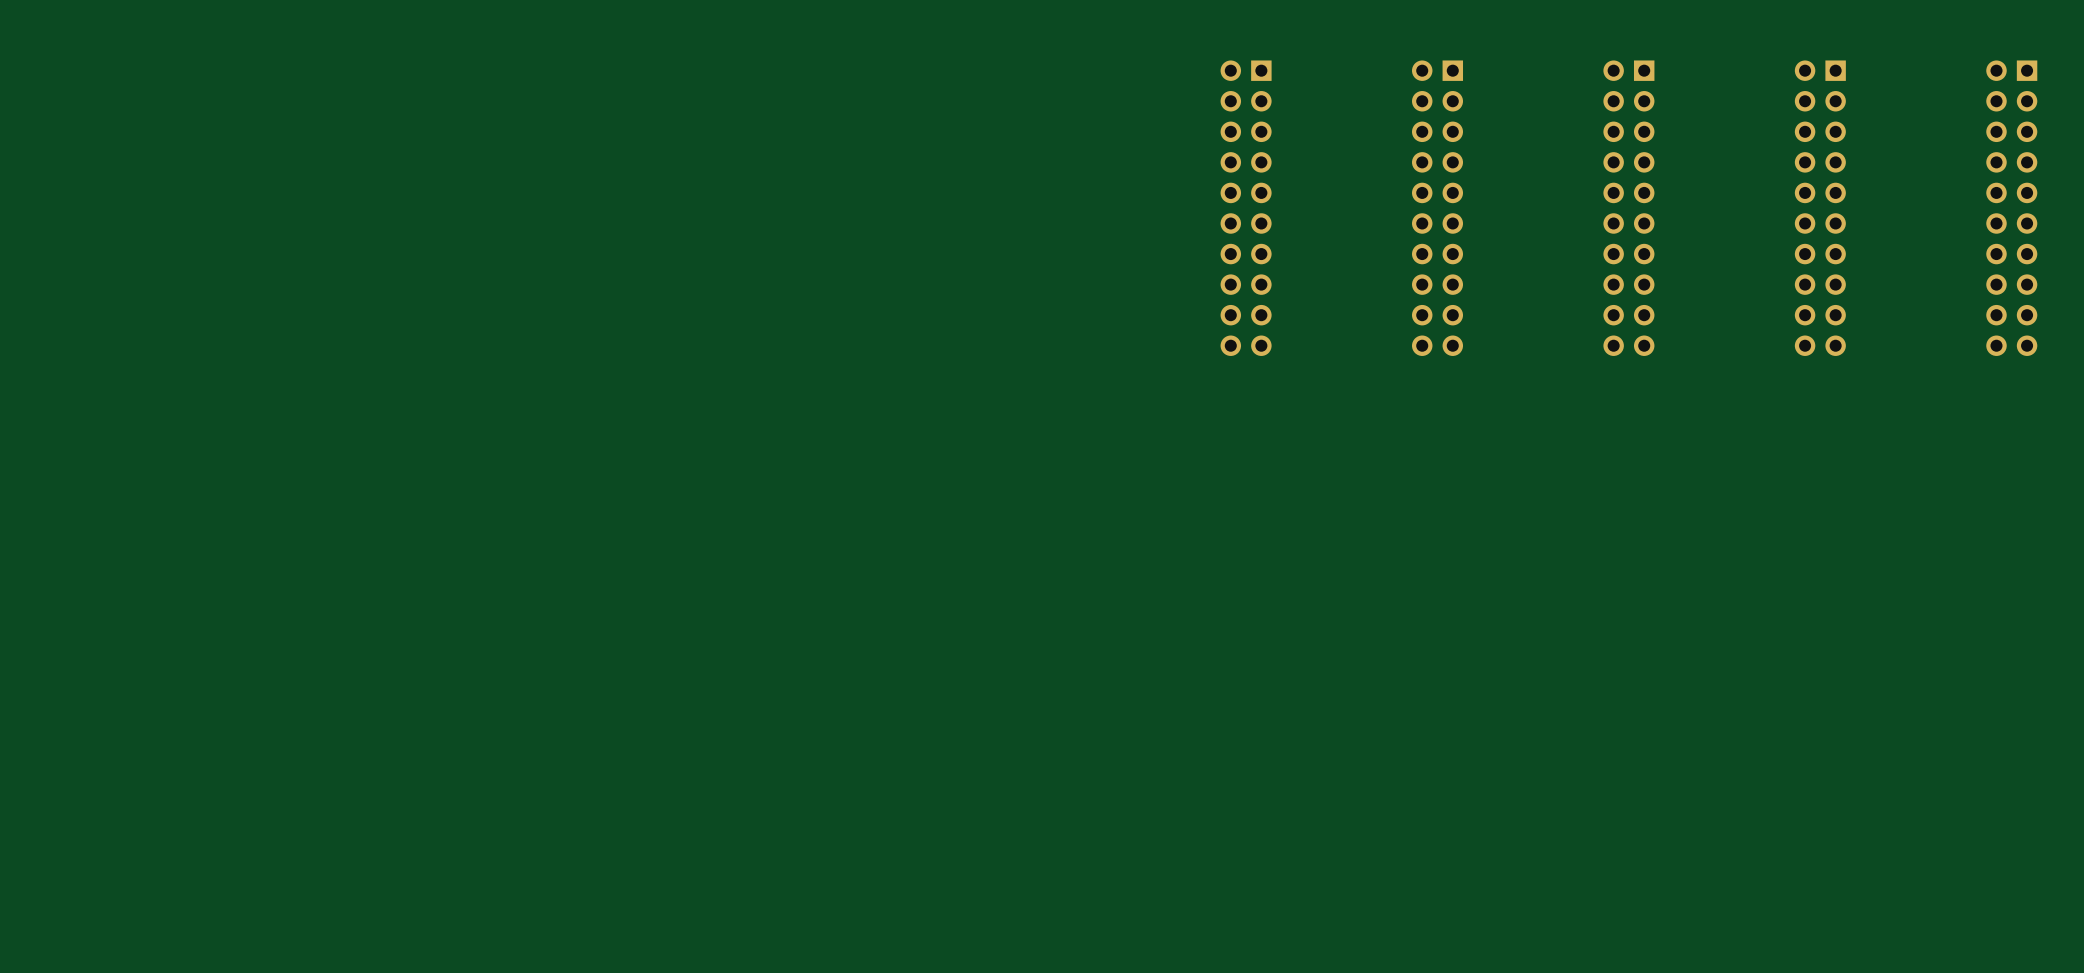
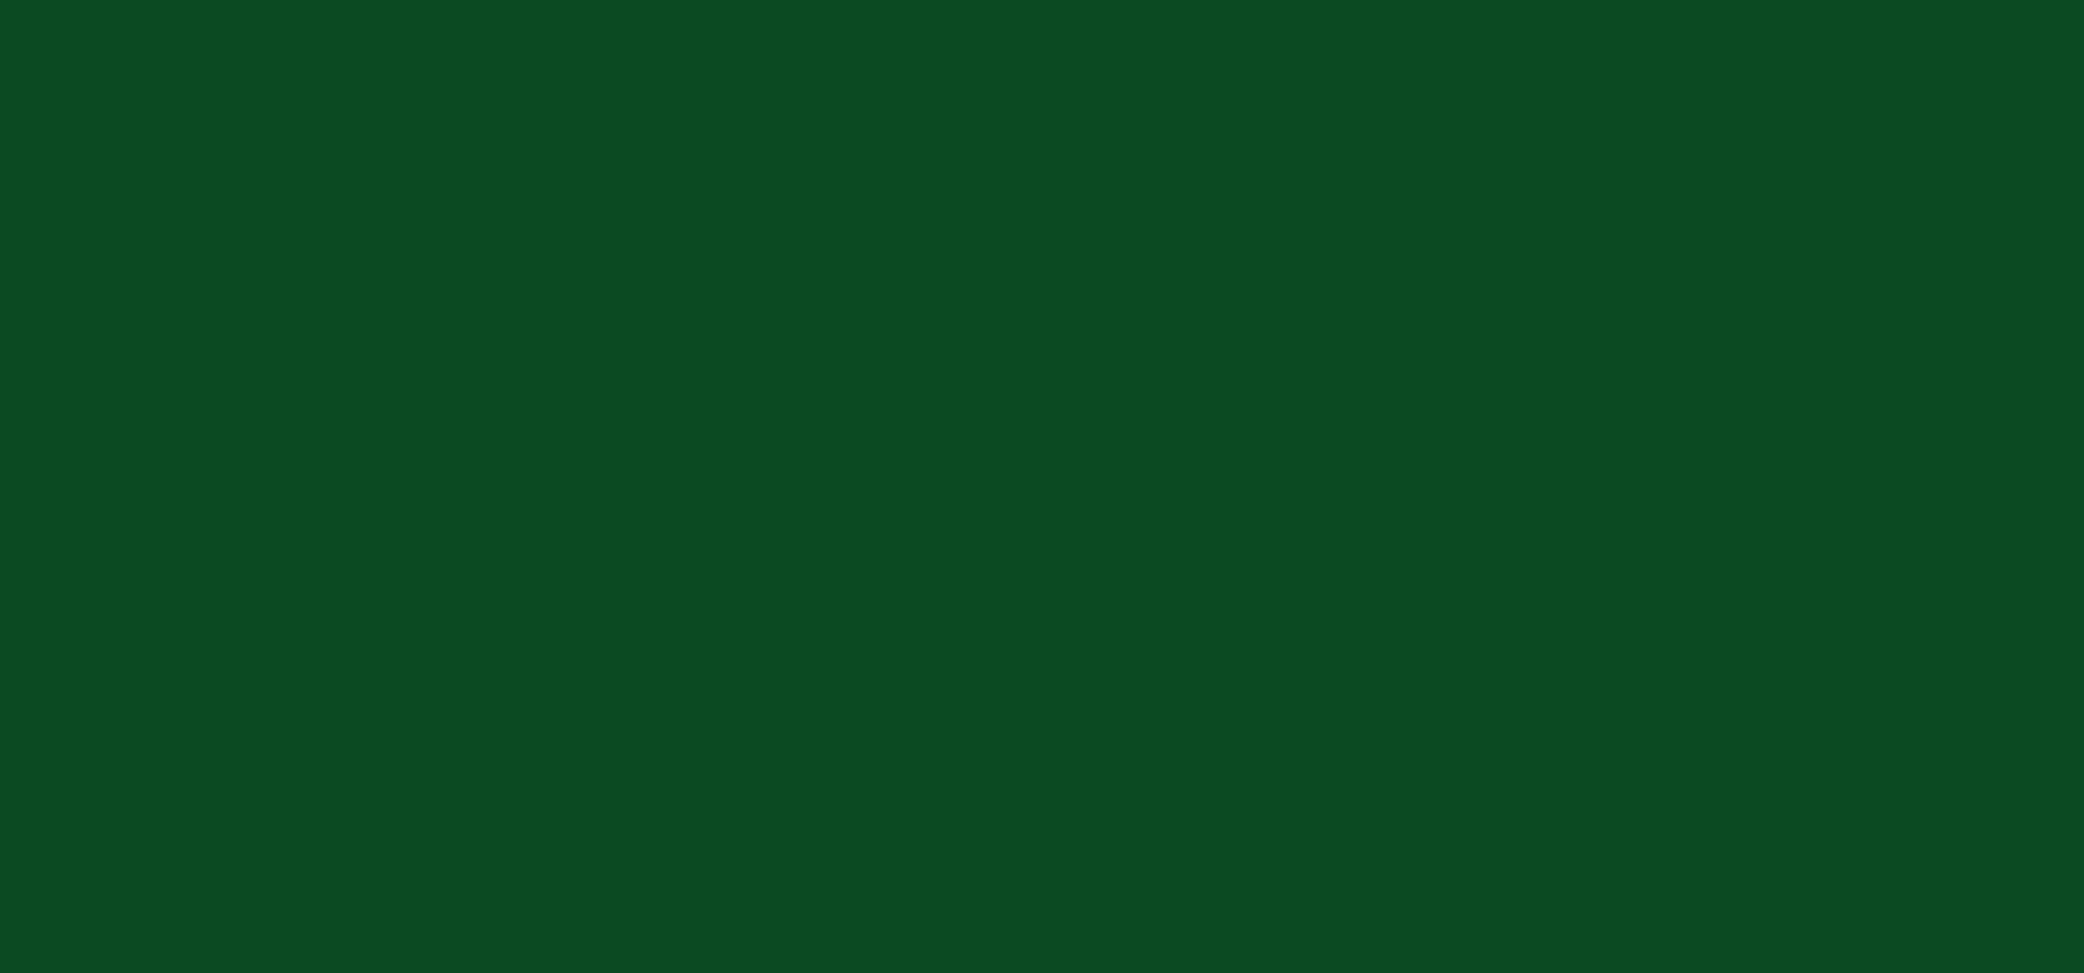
part: (1246, 208) -> none
part: (1437, 208) -> none
part: (1628, 208) -> none
part: (1820, 208) -> none
part: (2011, 208) -> none

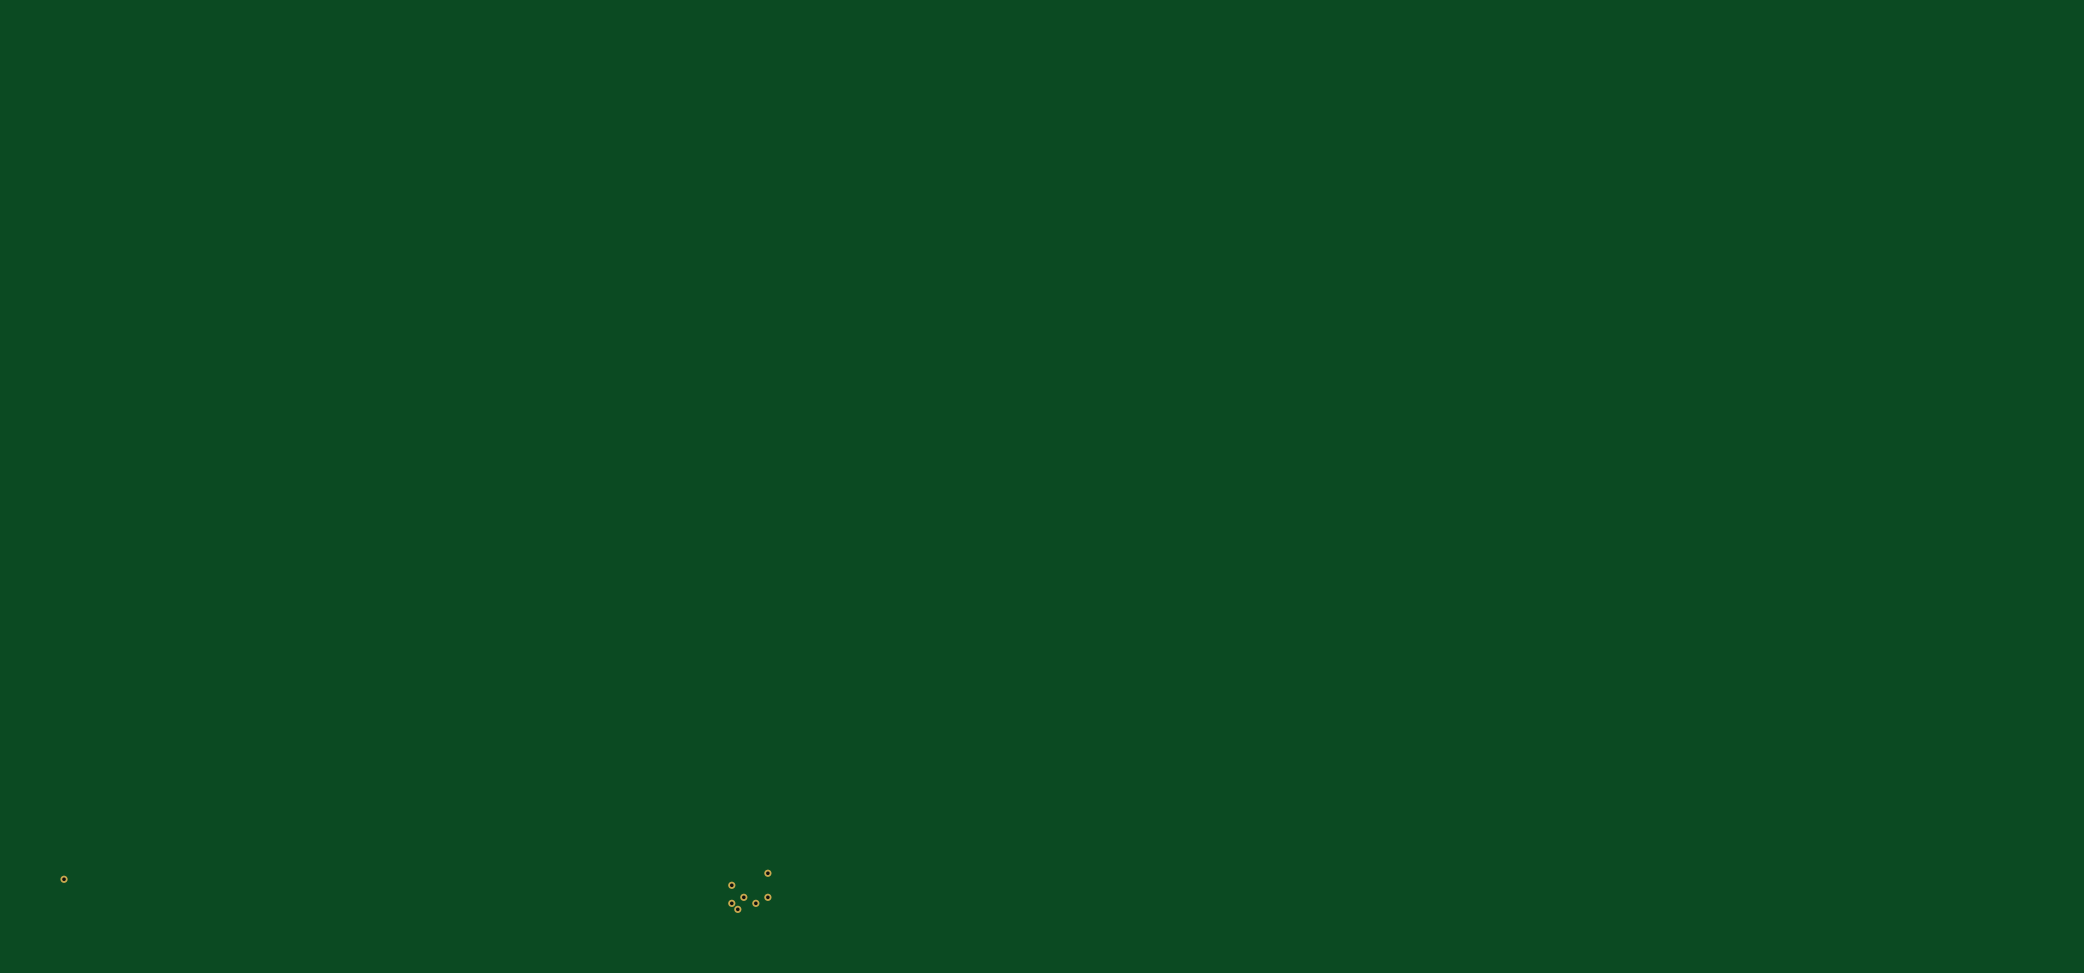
via: none -> (767, 873)
via: none -> (64, 879)
via: none -> (731, 885)
via: none -> (743, 897)
via: none -> (767, 897)
via: none -> (731, 903)
via: none -> (755, 903)
via: none -> (737, 909)

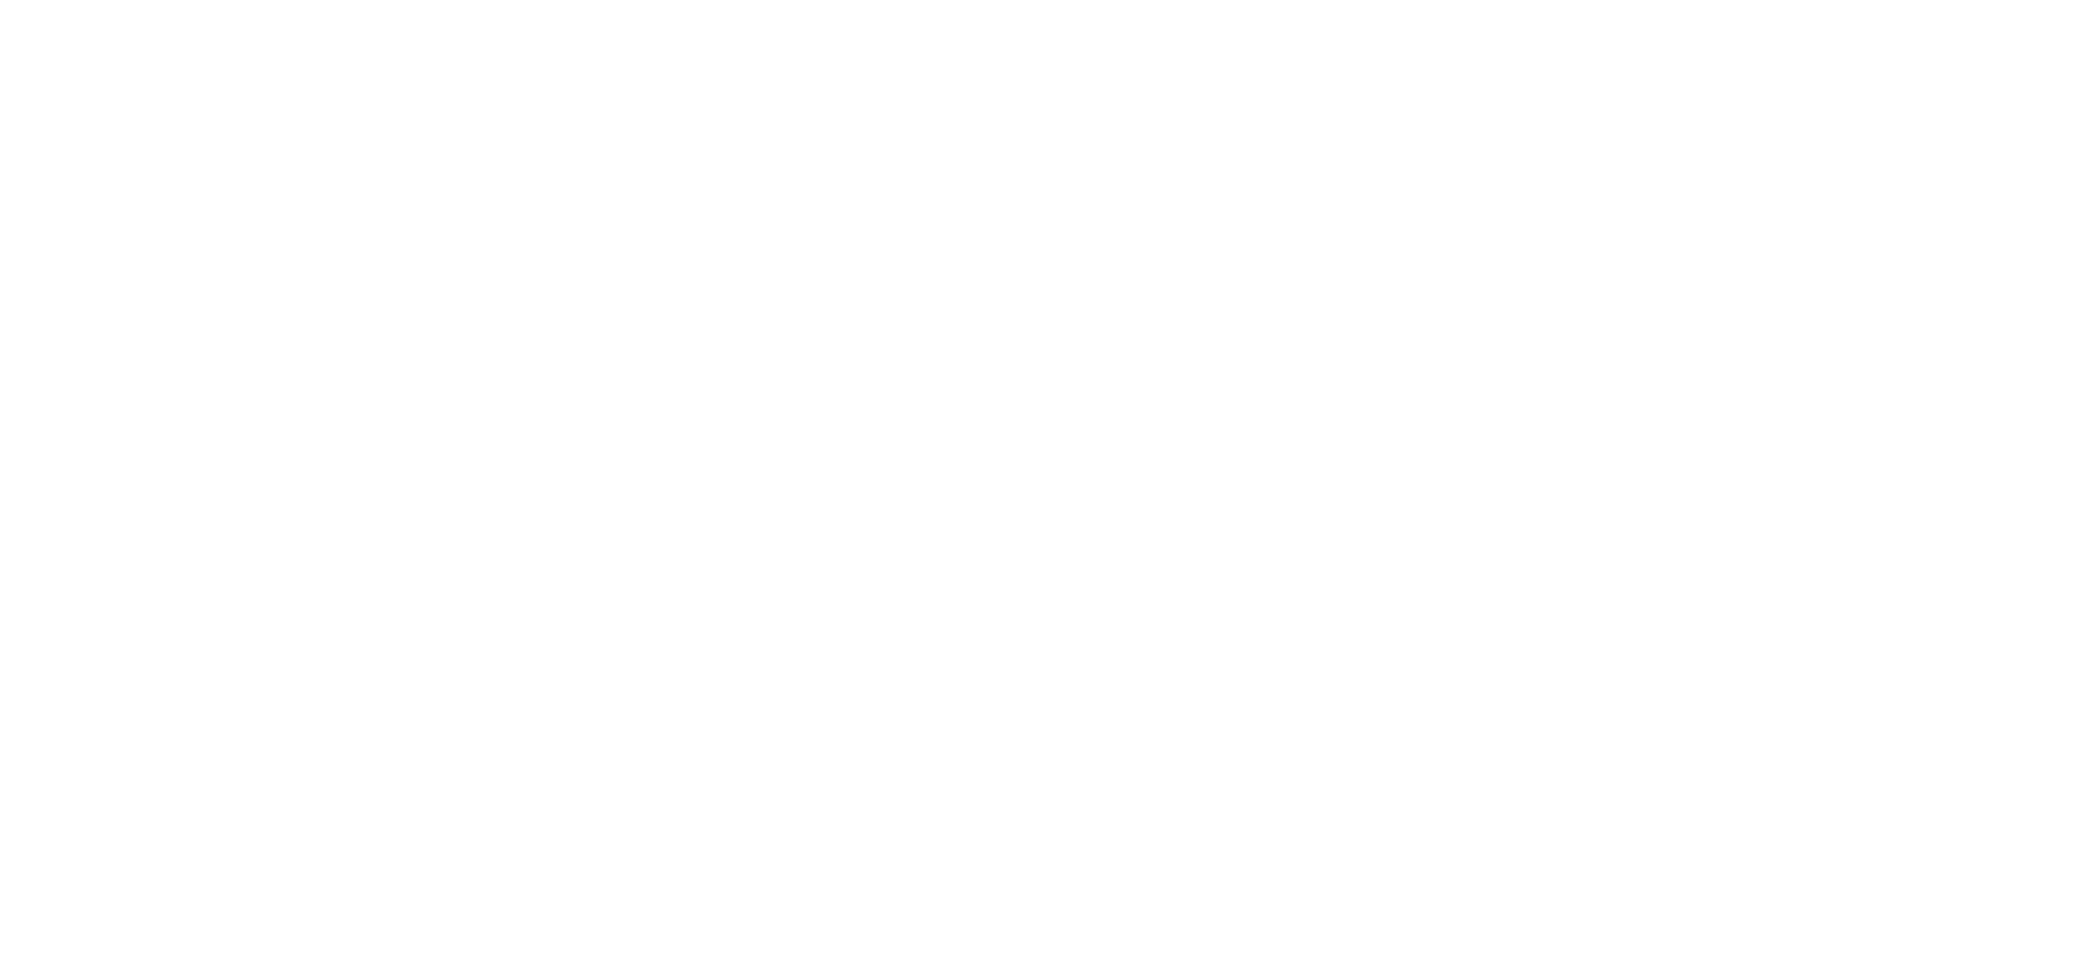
via: (767, 873) -> none
via: (64, 879) -> none
via: (731, 885) -> none
via: (743, 897) -> none
via: (767, 897) -> none
via: (731, 903) -> none
via: (755, 903) -> none
via: (737, 909) -> none

